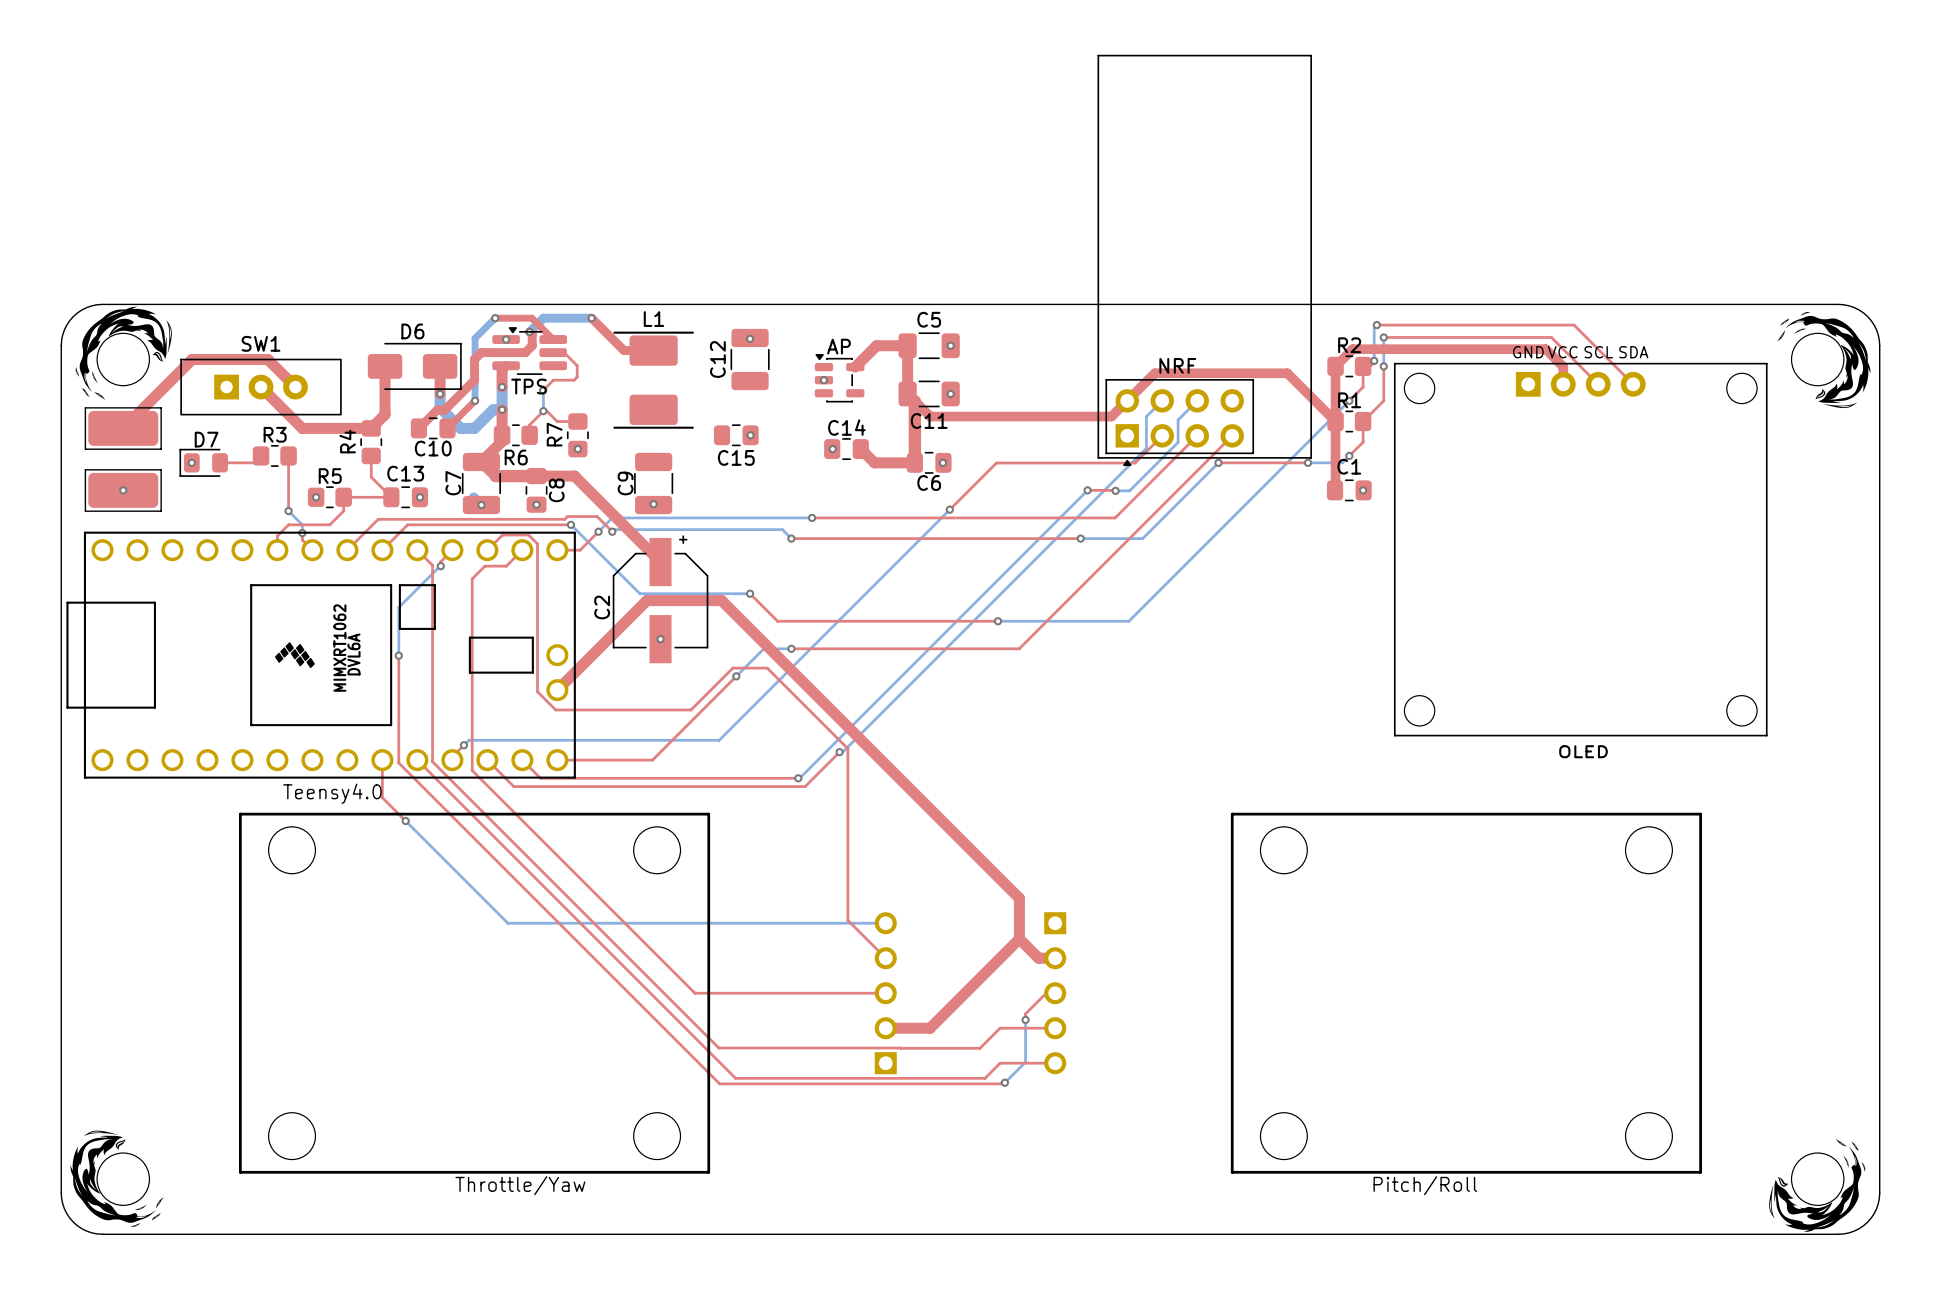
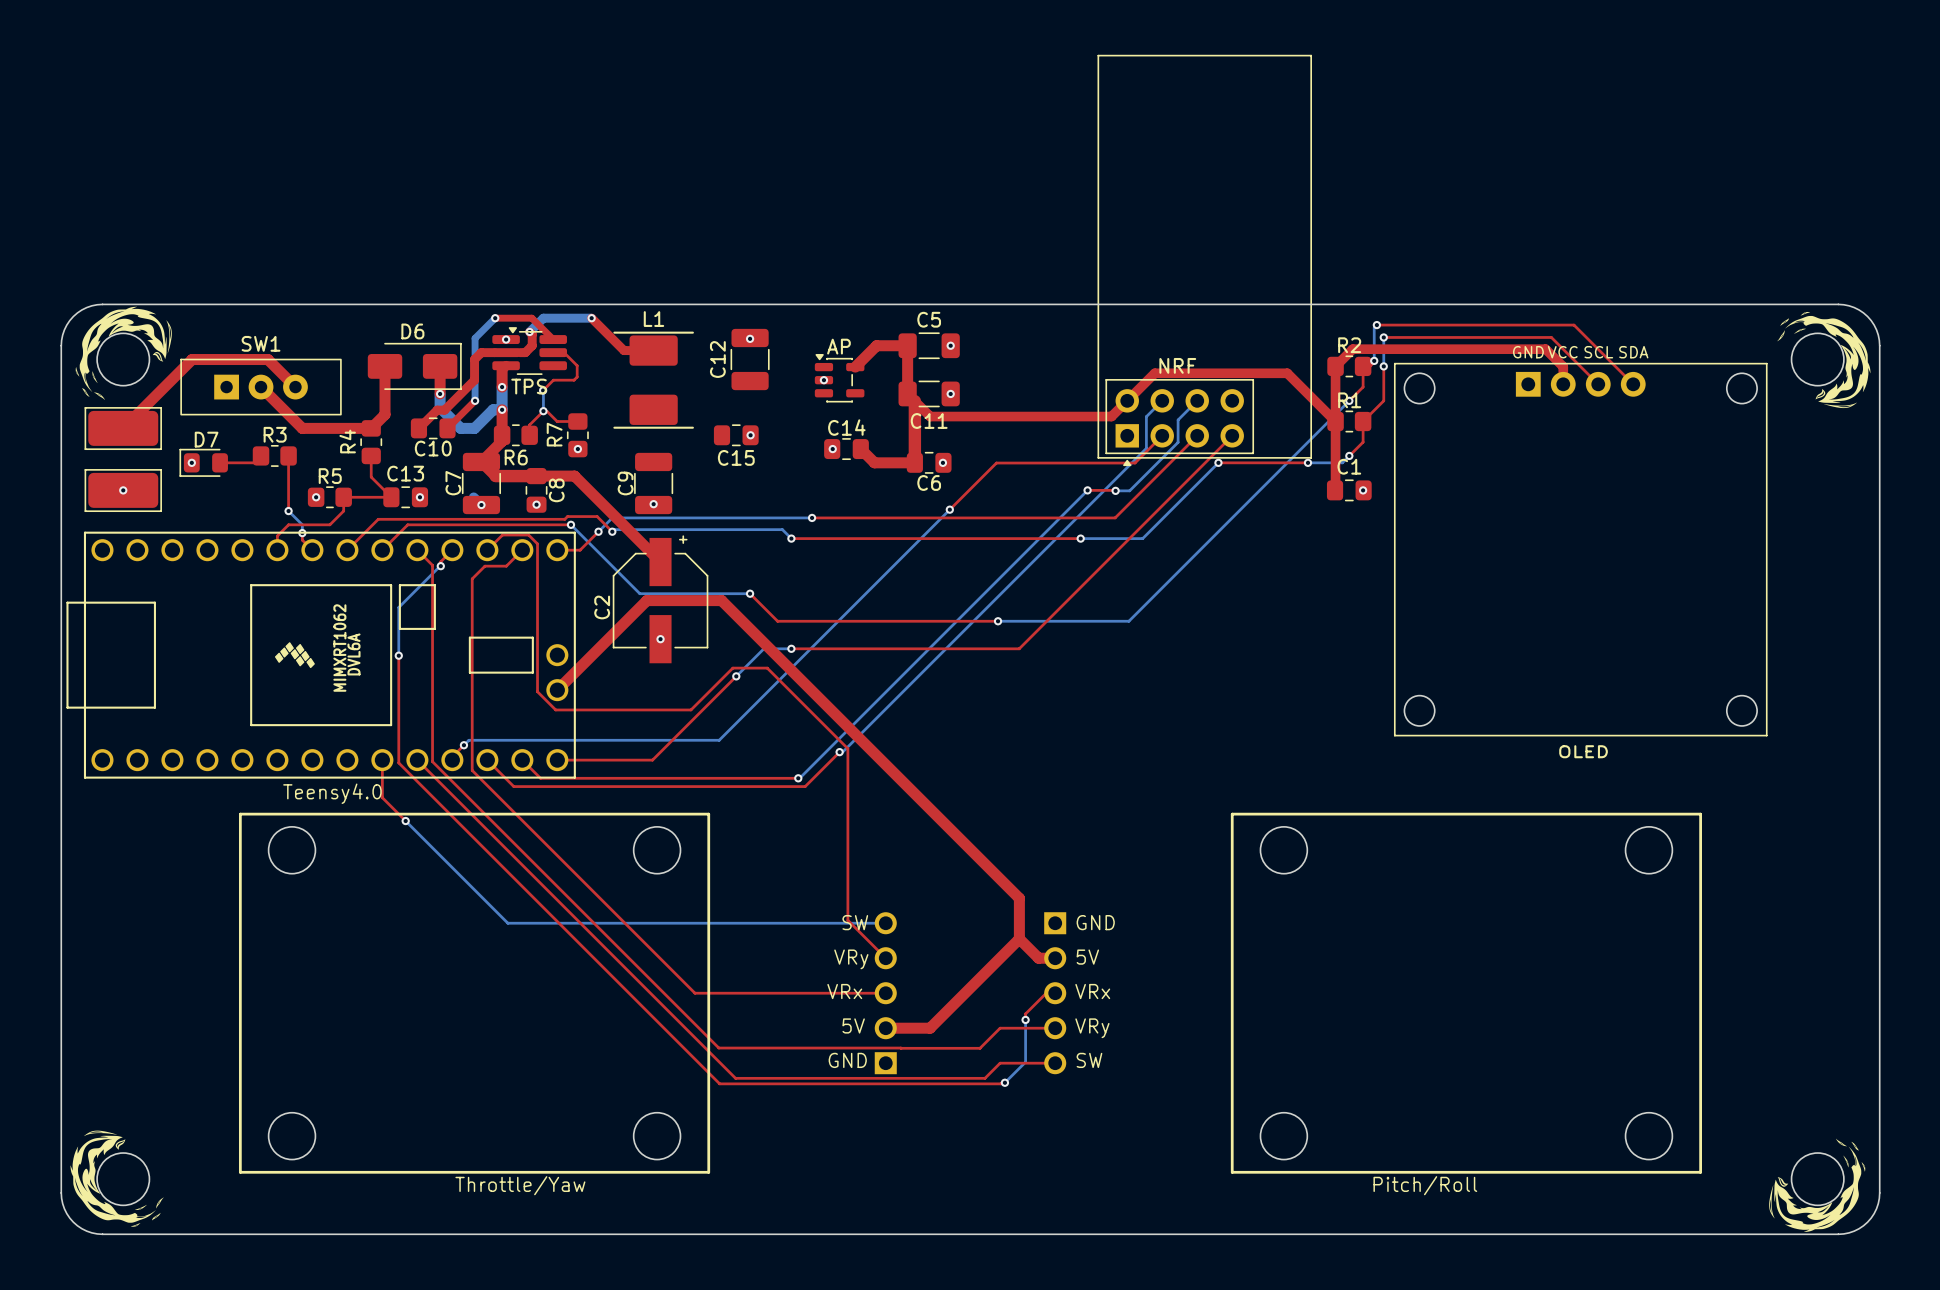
text: none -> SW (855, 922)
text: none -> GND (1095, 922)
text: none -> 5V (1087, 957)
text: none -> VRy (851, 959)
text: none -> VRx (844, 991)
text: none -> VRx (1092, 991)
text: none -> 5V (853, 1025)
text: none -> VRy (1092, 1028)
text: none -> GND (847, 1060)
text: none -> SW (1089, 1060)

